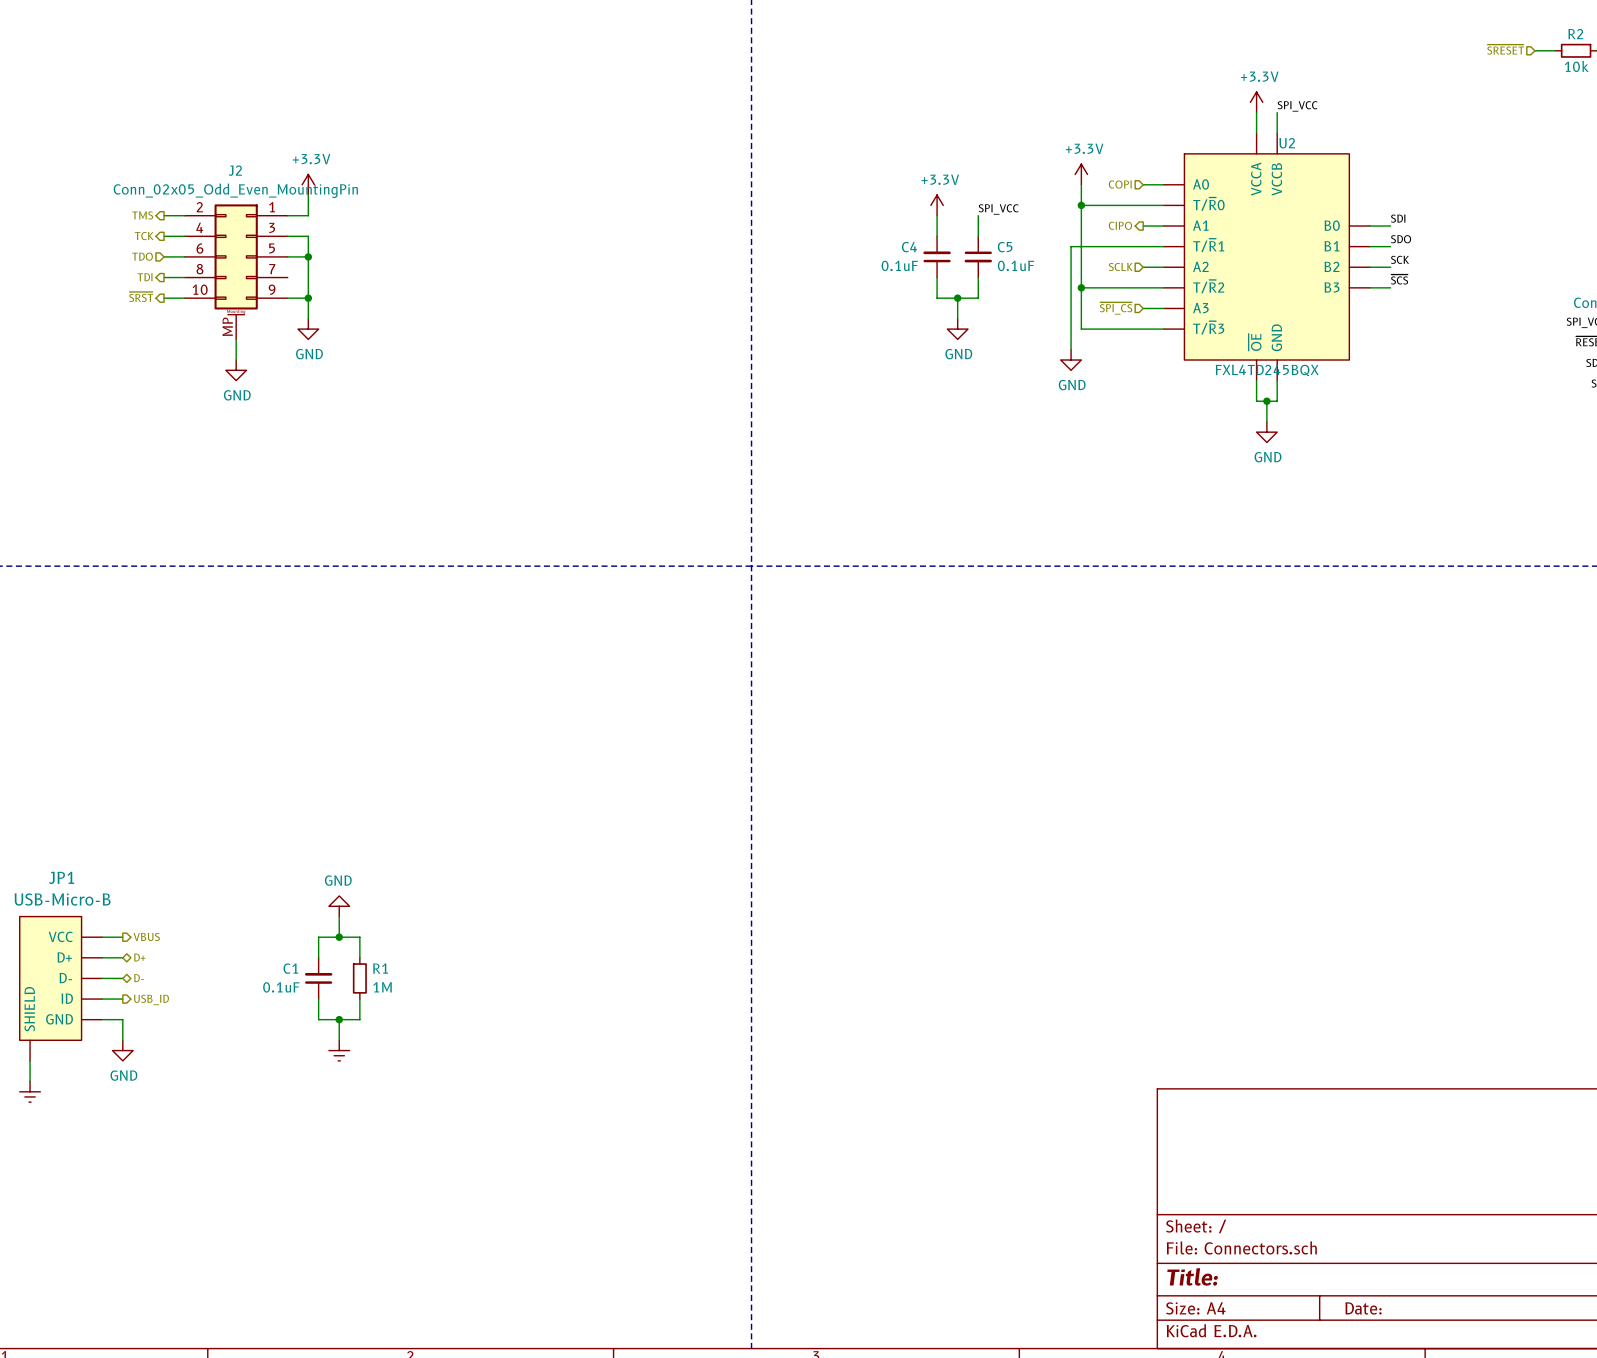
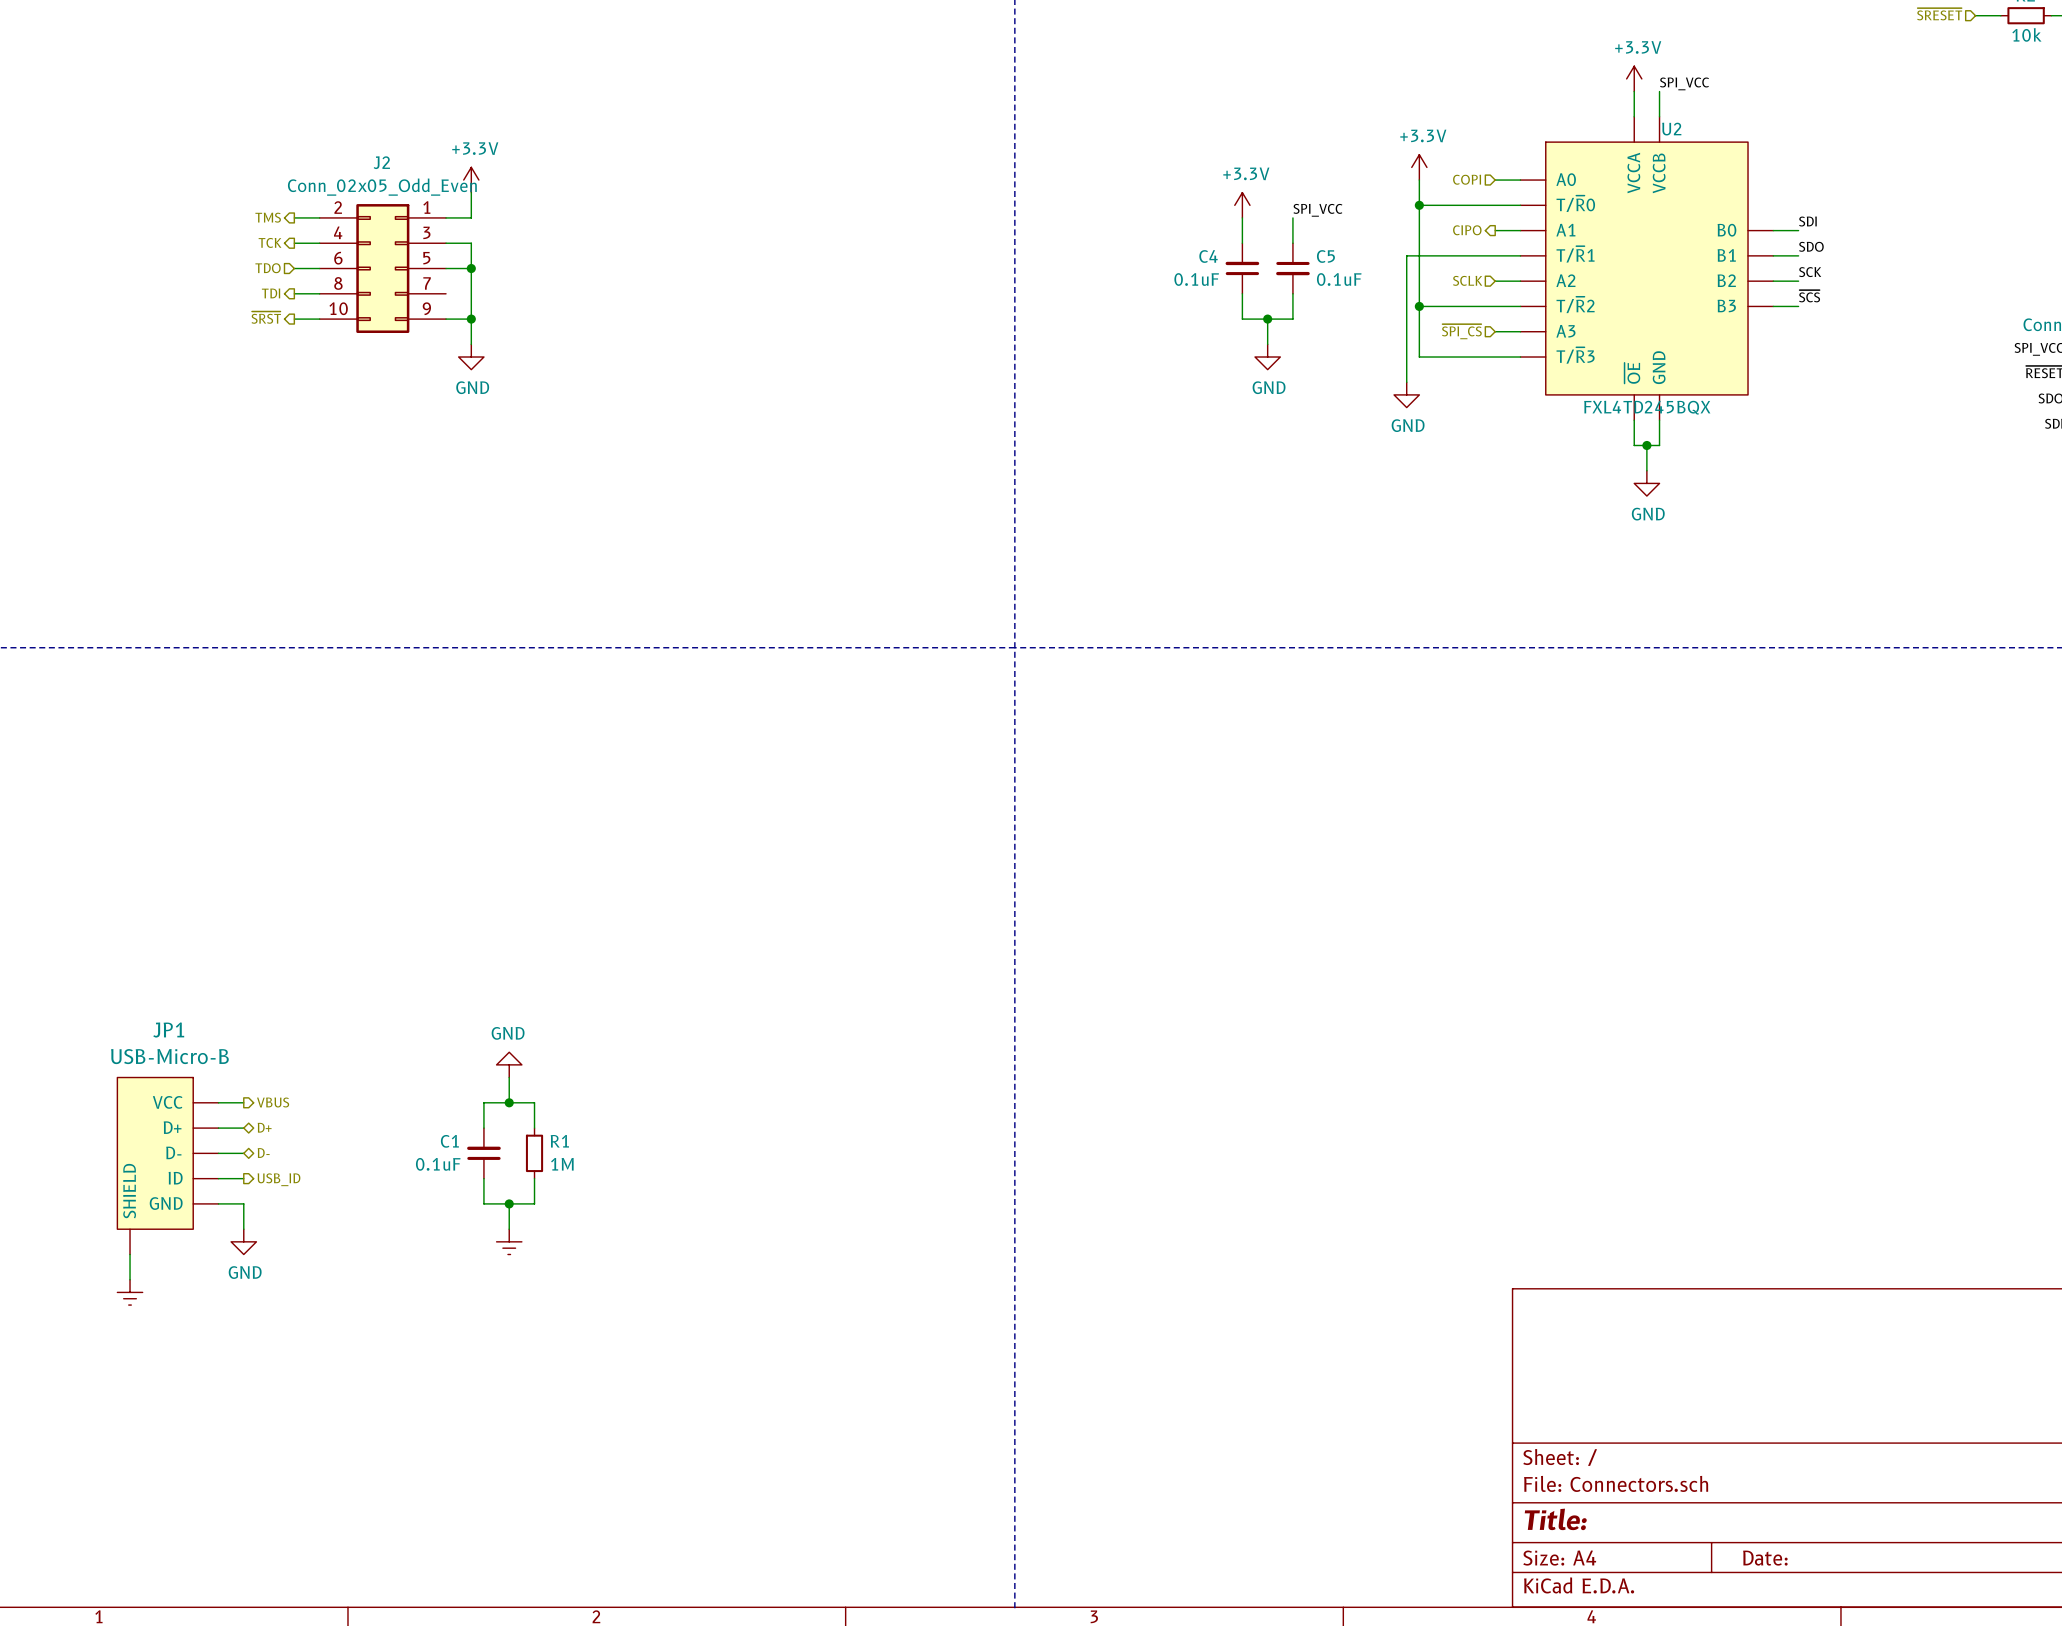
J2 value: Conn_02x05_Odd_Even_MountingPin (235, 190) -> Conn_02x05_Odd_Even (382, 187)
J2 symbol: [184, 204, 288, 340] -> [319, 204, 447, 333]
wire: (236, 339) (236, 360) -> none
power symbol: GND (236, 370) -> none

